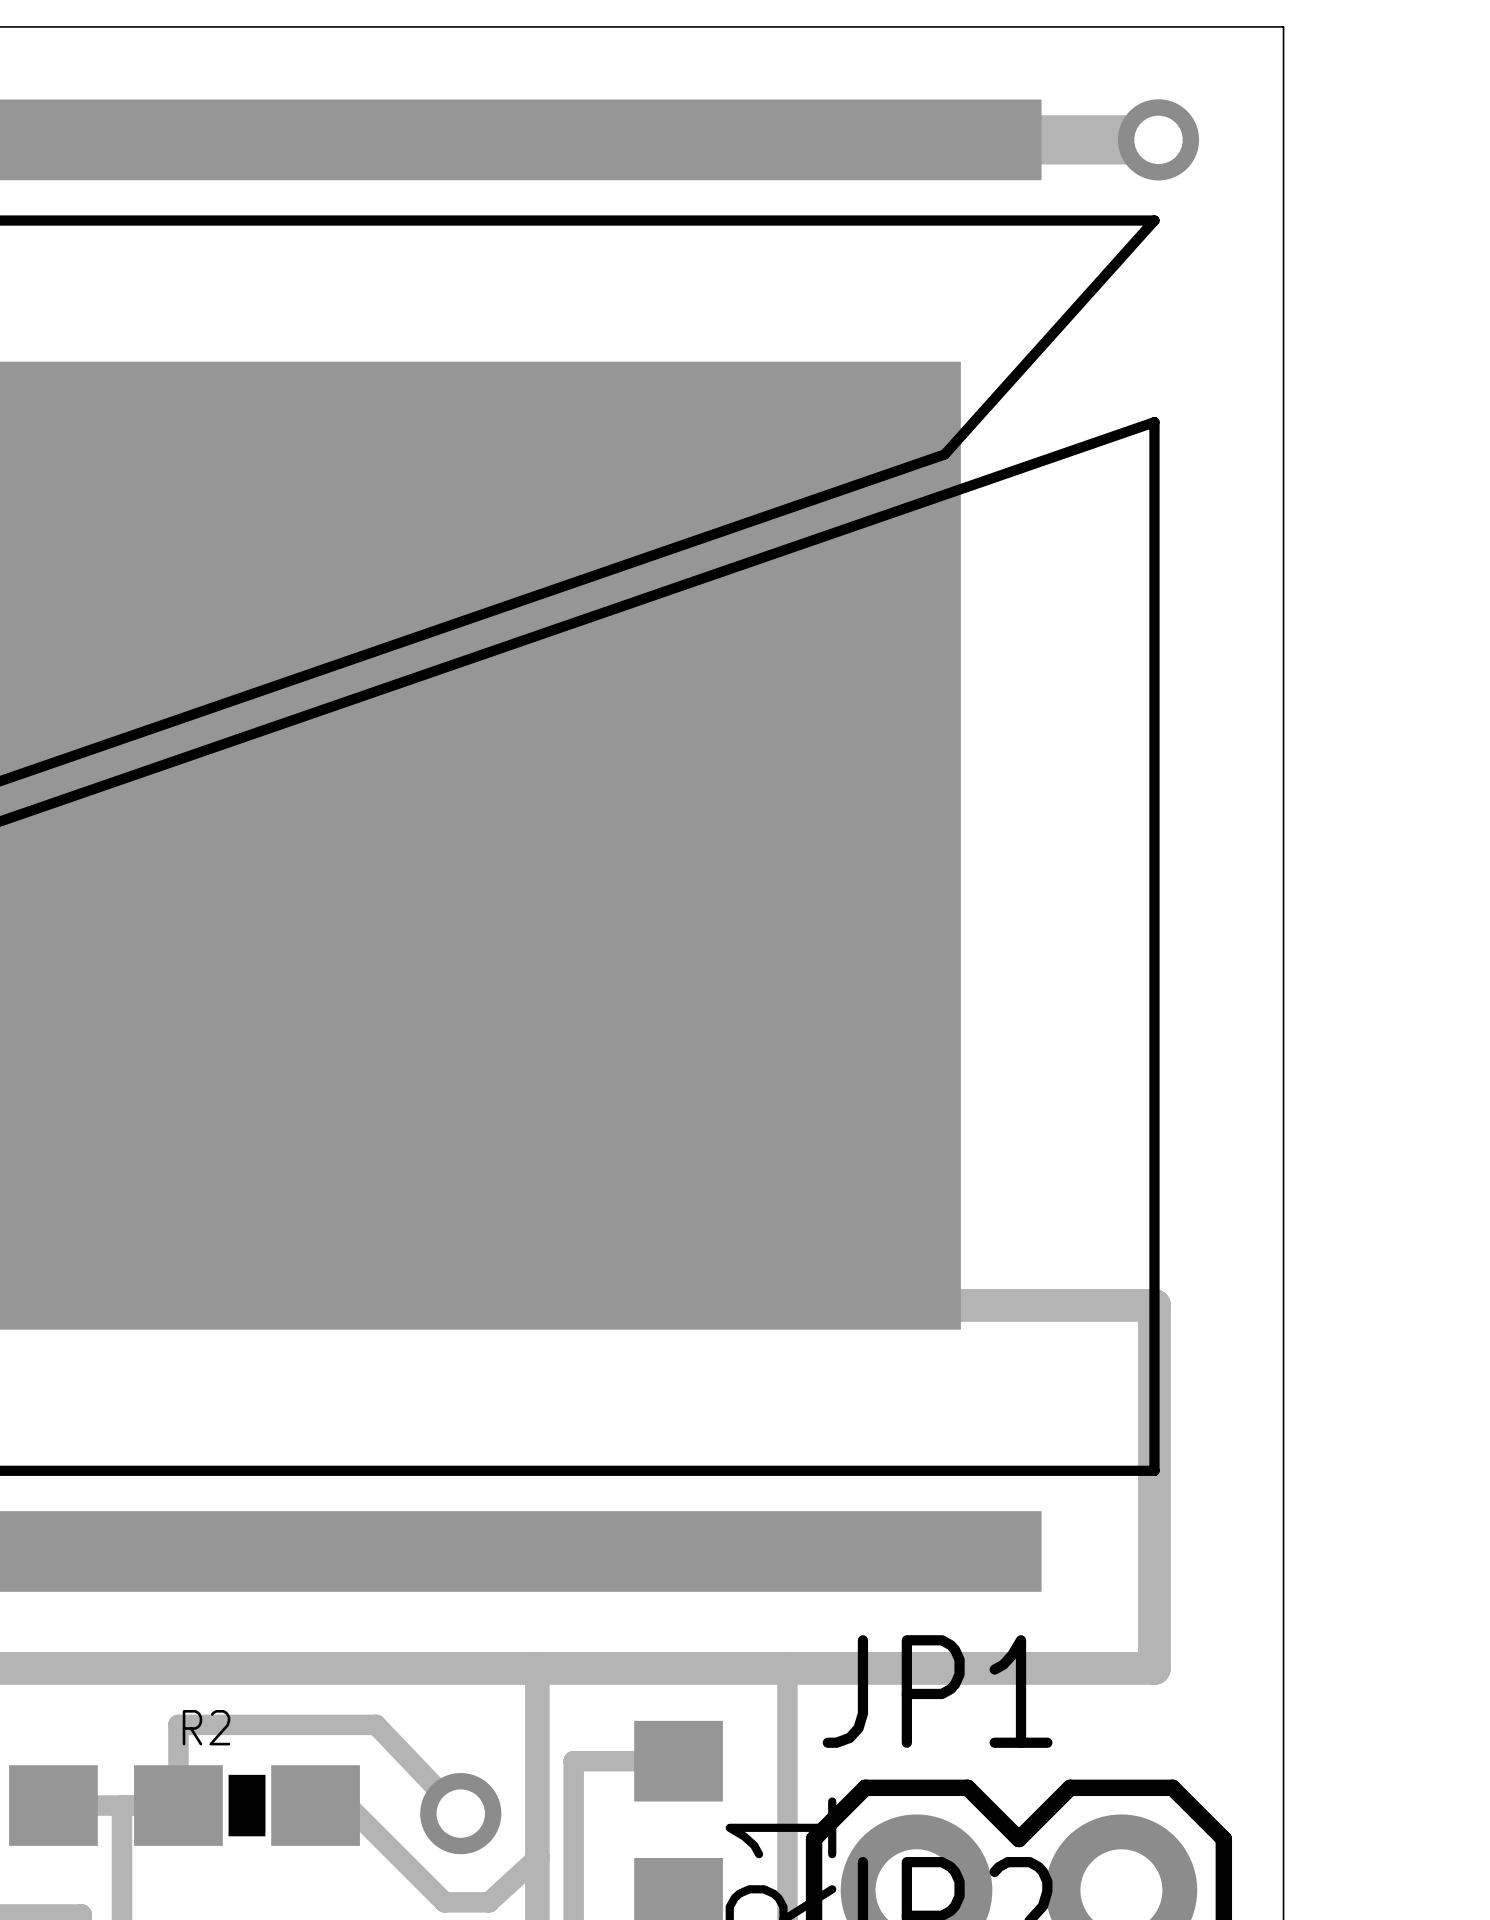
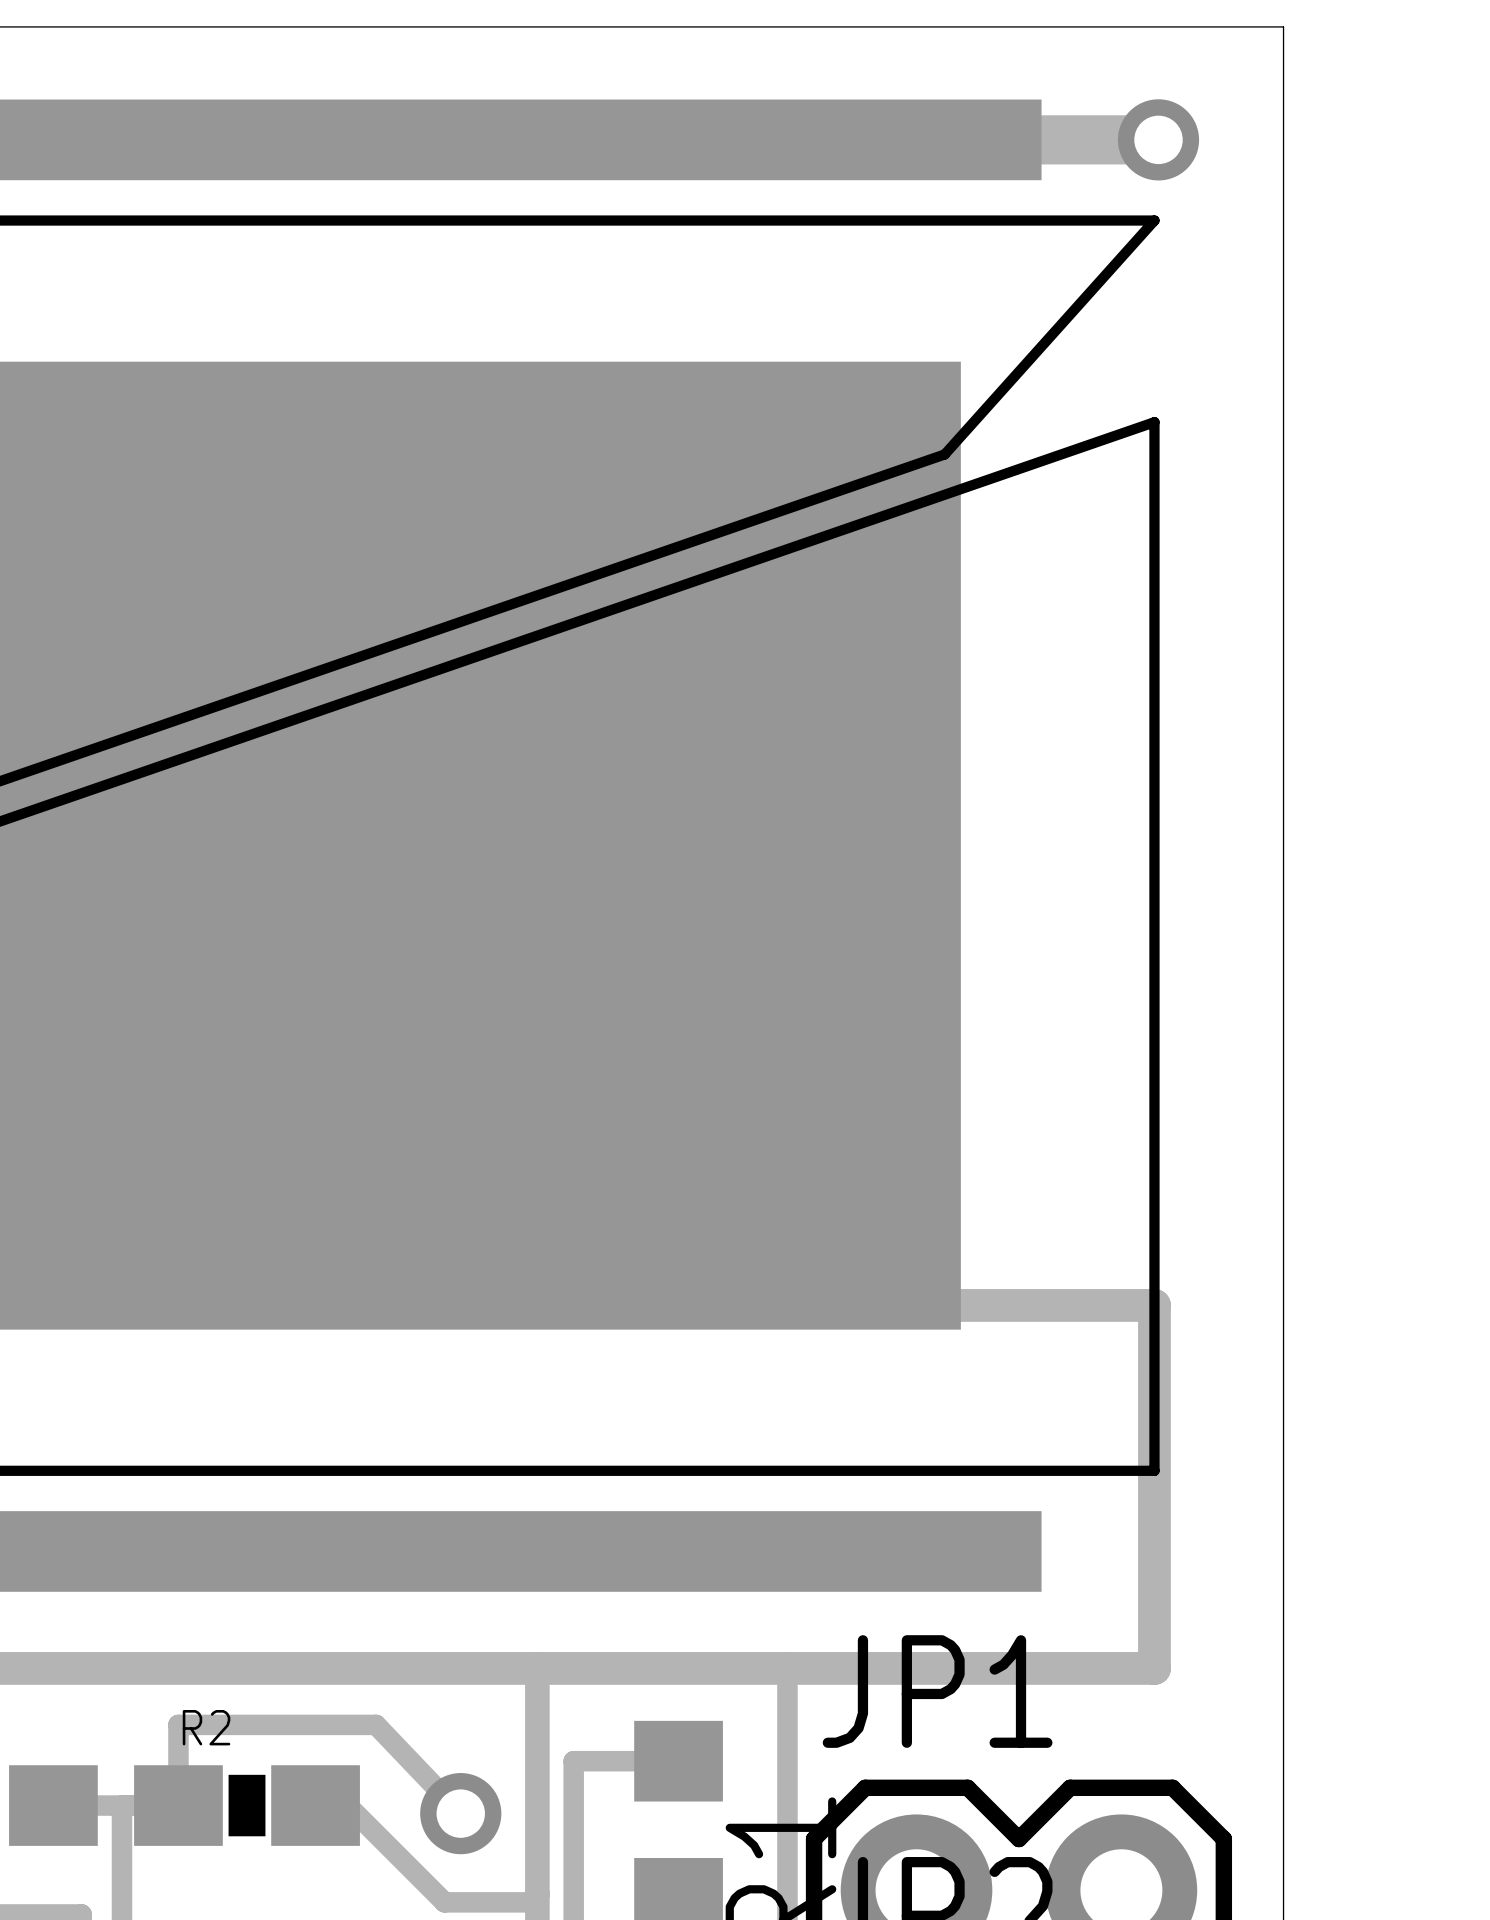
track: (537, 1857) (489, 1902) -> (537, 1894) (529, 1902) (489, 1902)

